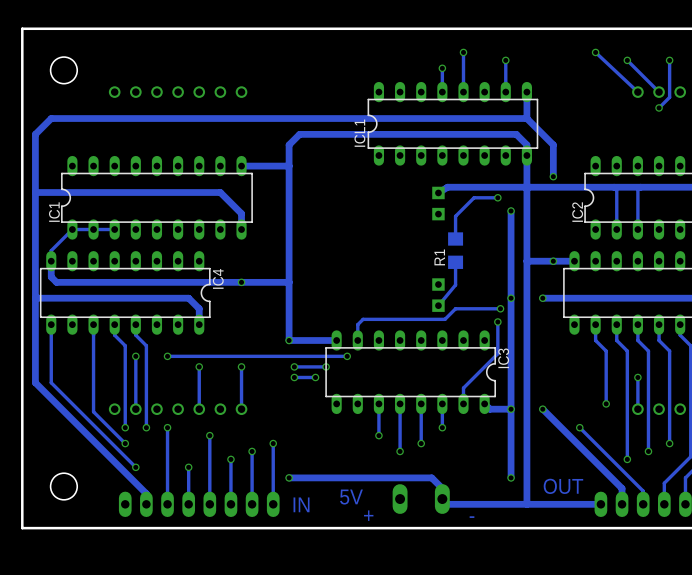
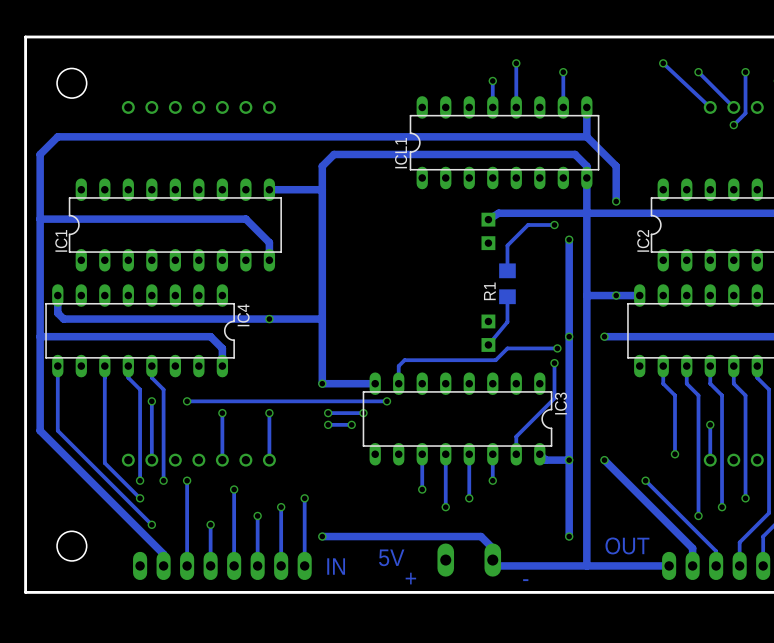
track: (614, 187) (616, 189) (616, 229) -> none
track: (640, 187) (637, 189) (637, 229) -> none
track: (114, 229) (72, 229) (51, 250) (51, 261) -> none

